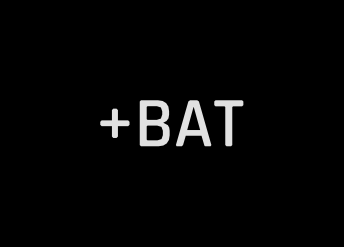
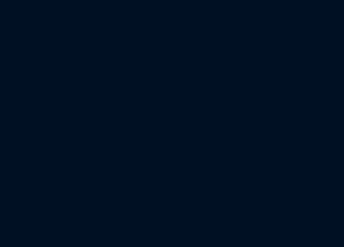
drawing: [100, 100, 244, 147] -> none

